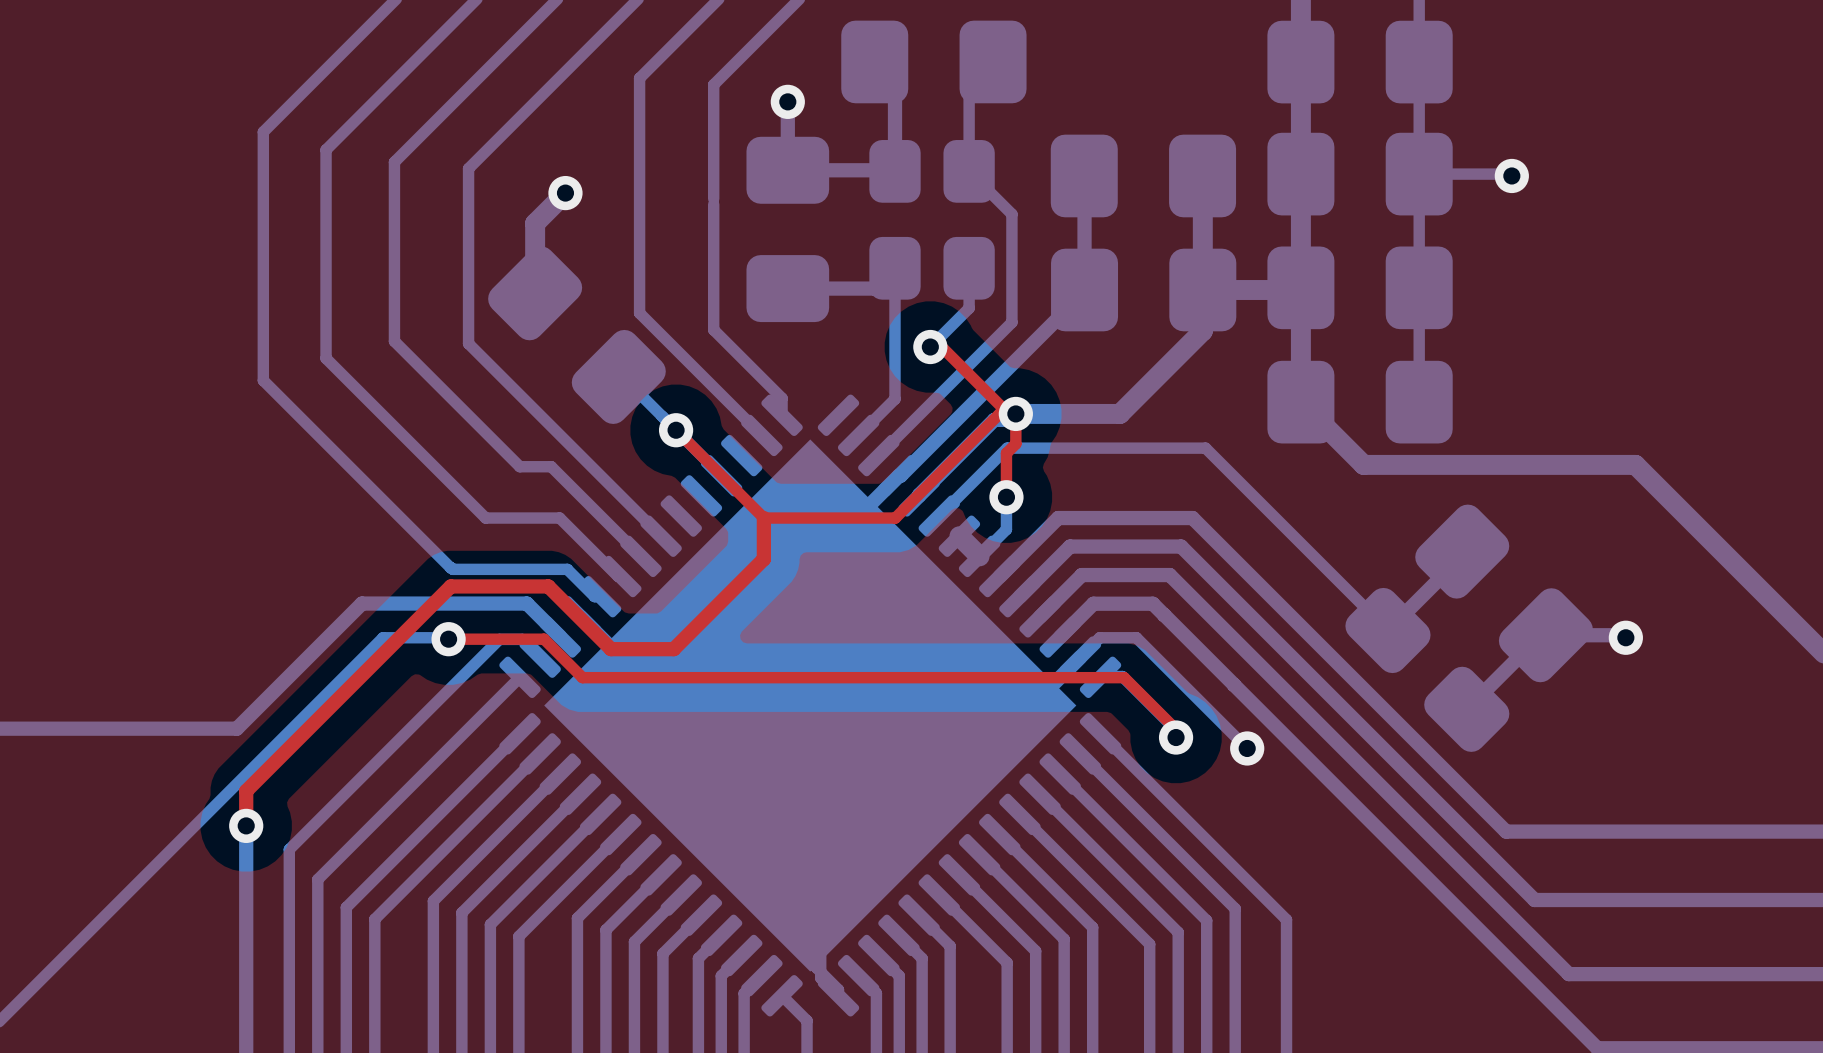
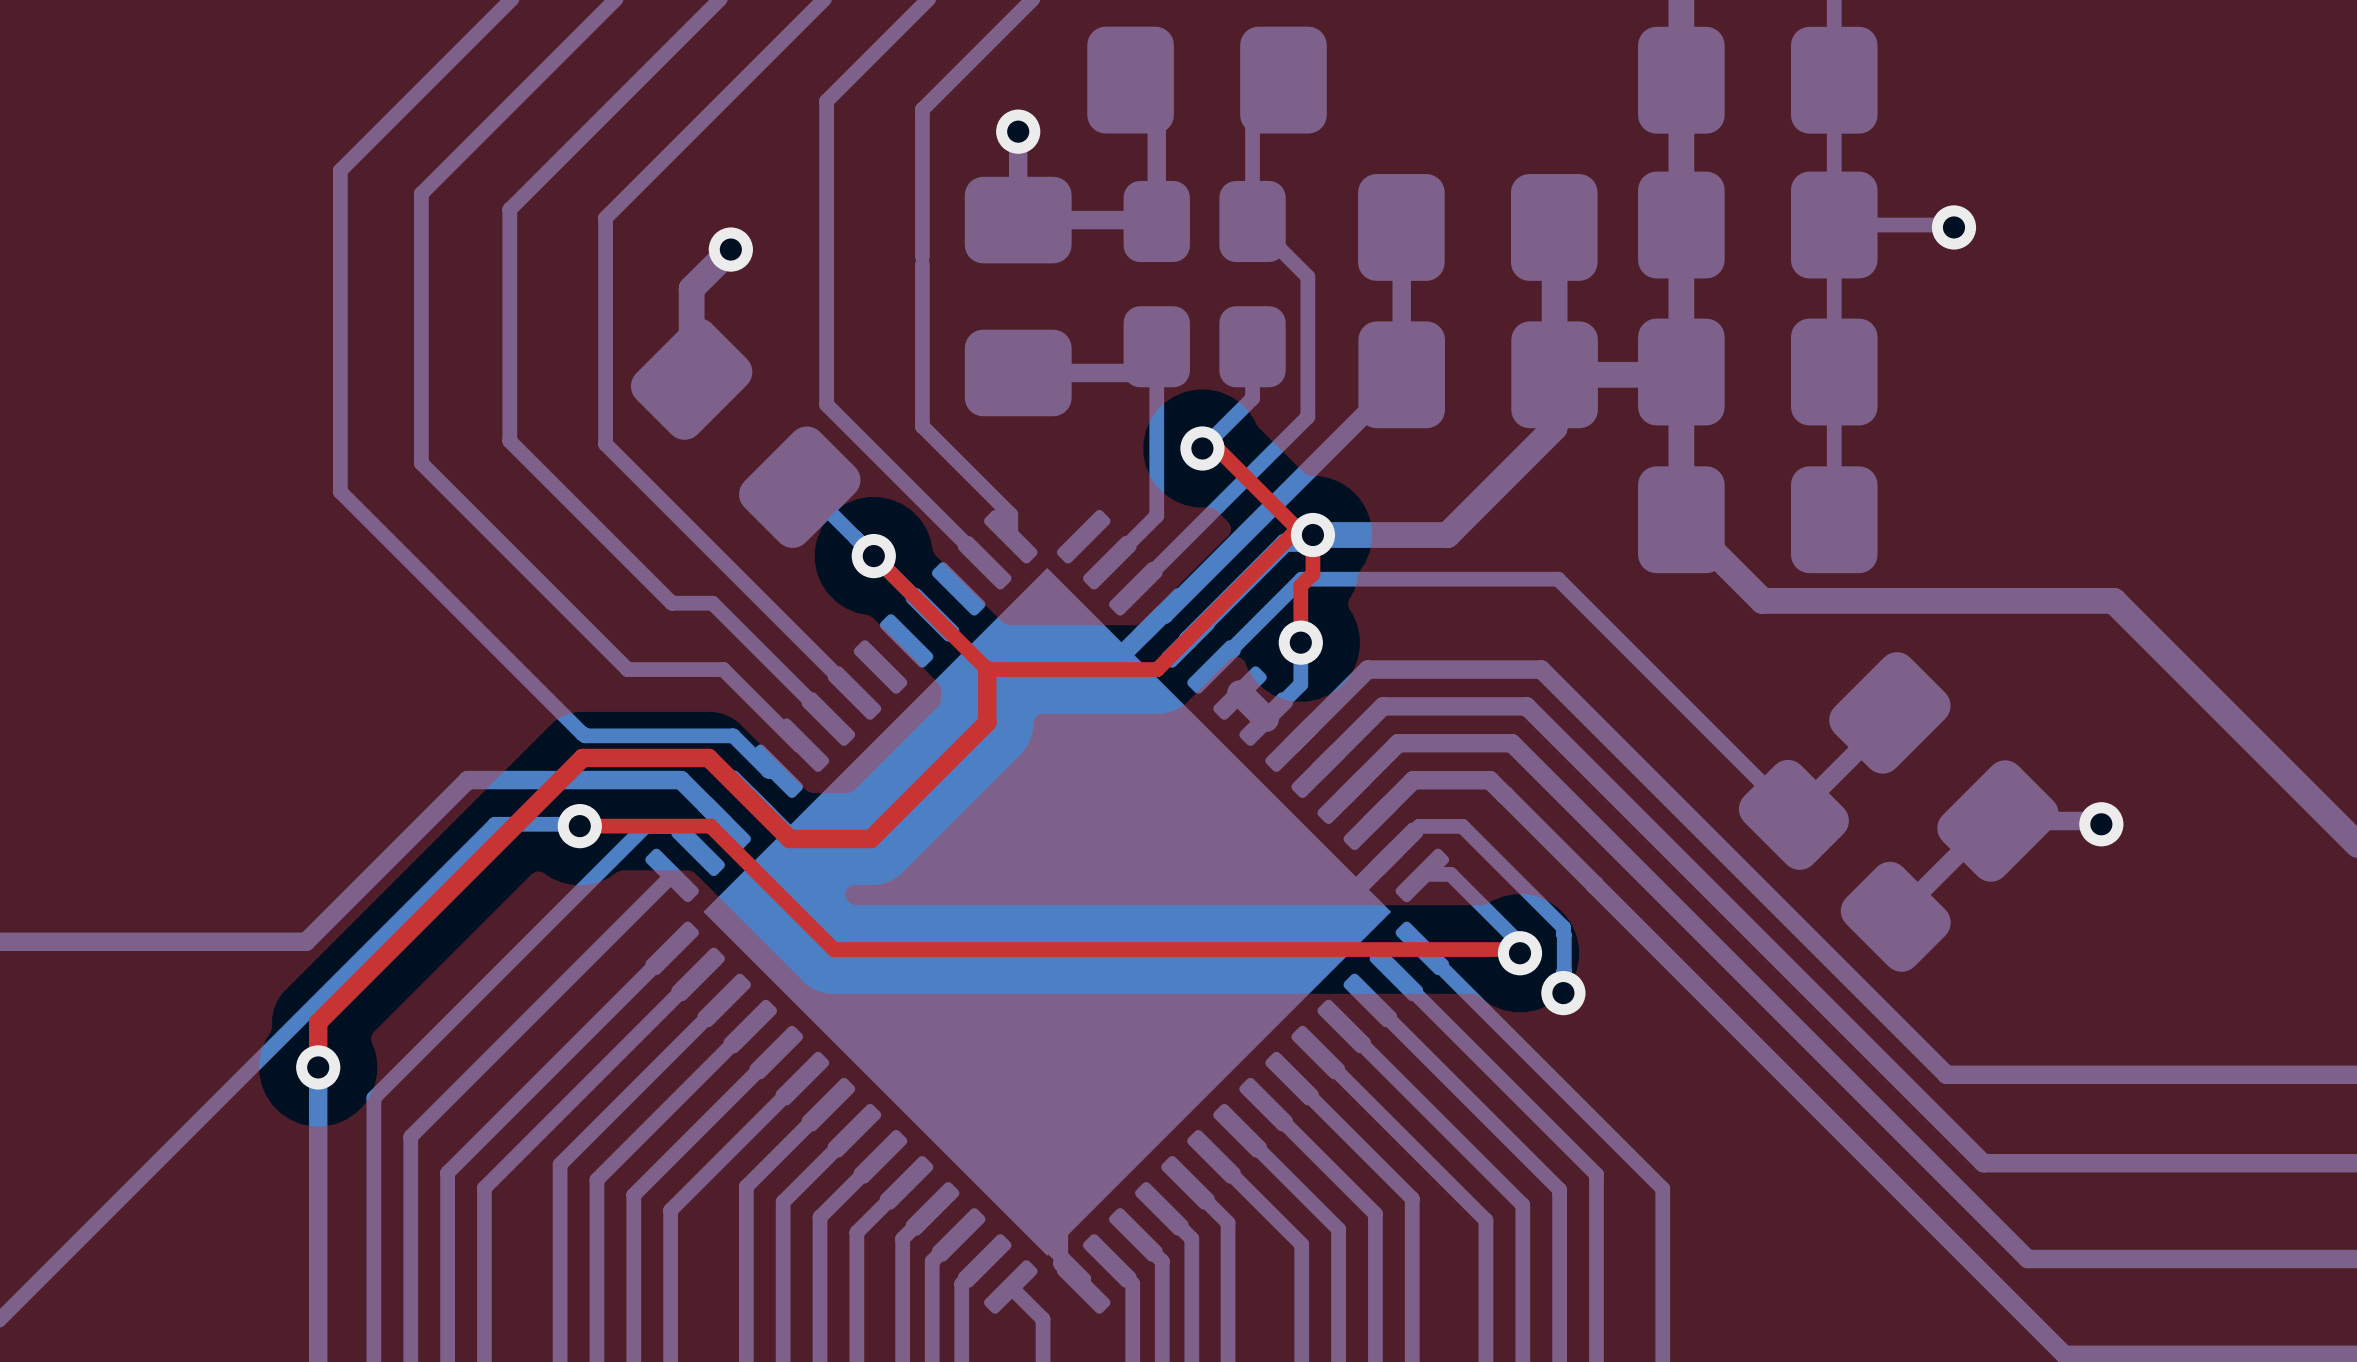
top track: (544, 639) (582, 677) (1124, 677) (1173, 726) (1173, 734) -> (703, 826) (710, 826) (834, 949) (1516, 949)
bottom track: (1098, 639) (1099, 637) (1136, 637) (1247, 748) -> (1419, 826) (1462, 826) (1563, 927) (1563, 934)
bottom track: none -> (1564, 934) (1564, 971)
via position: (1247, 748) -> (1563, 993)

